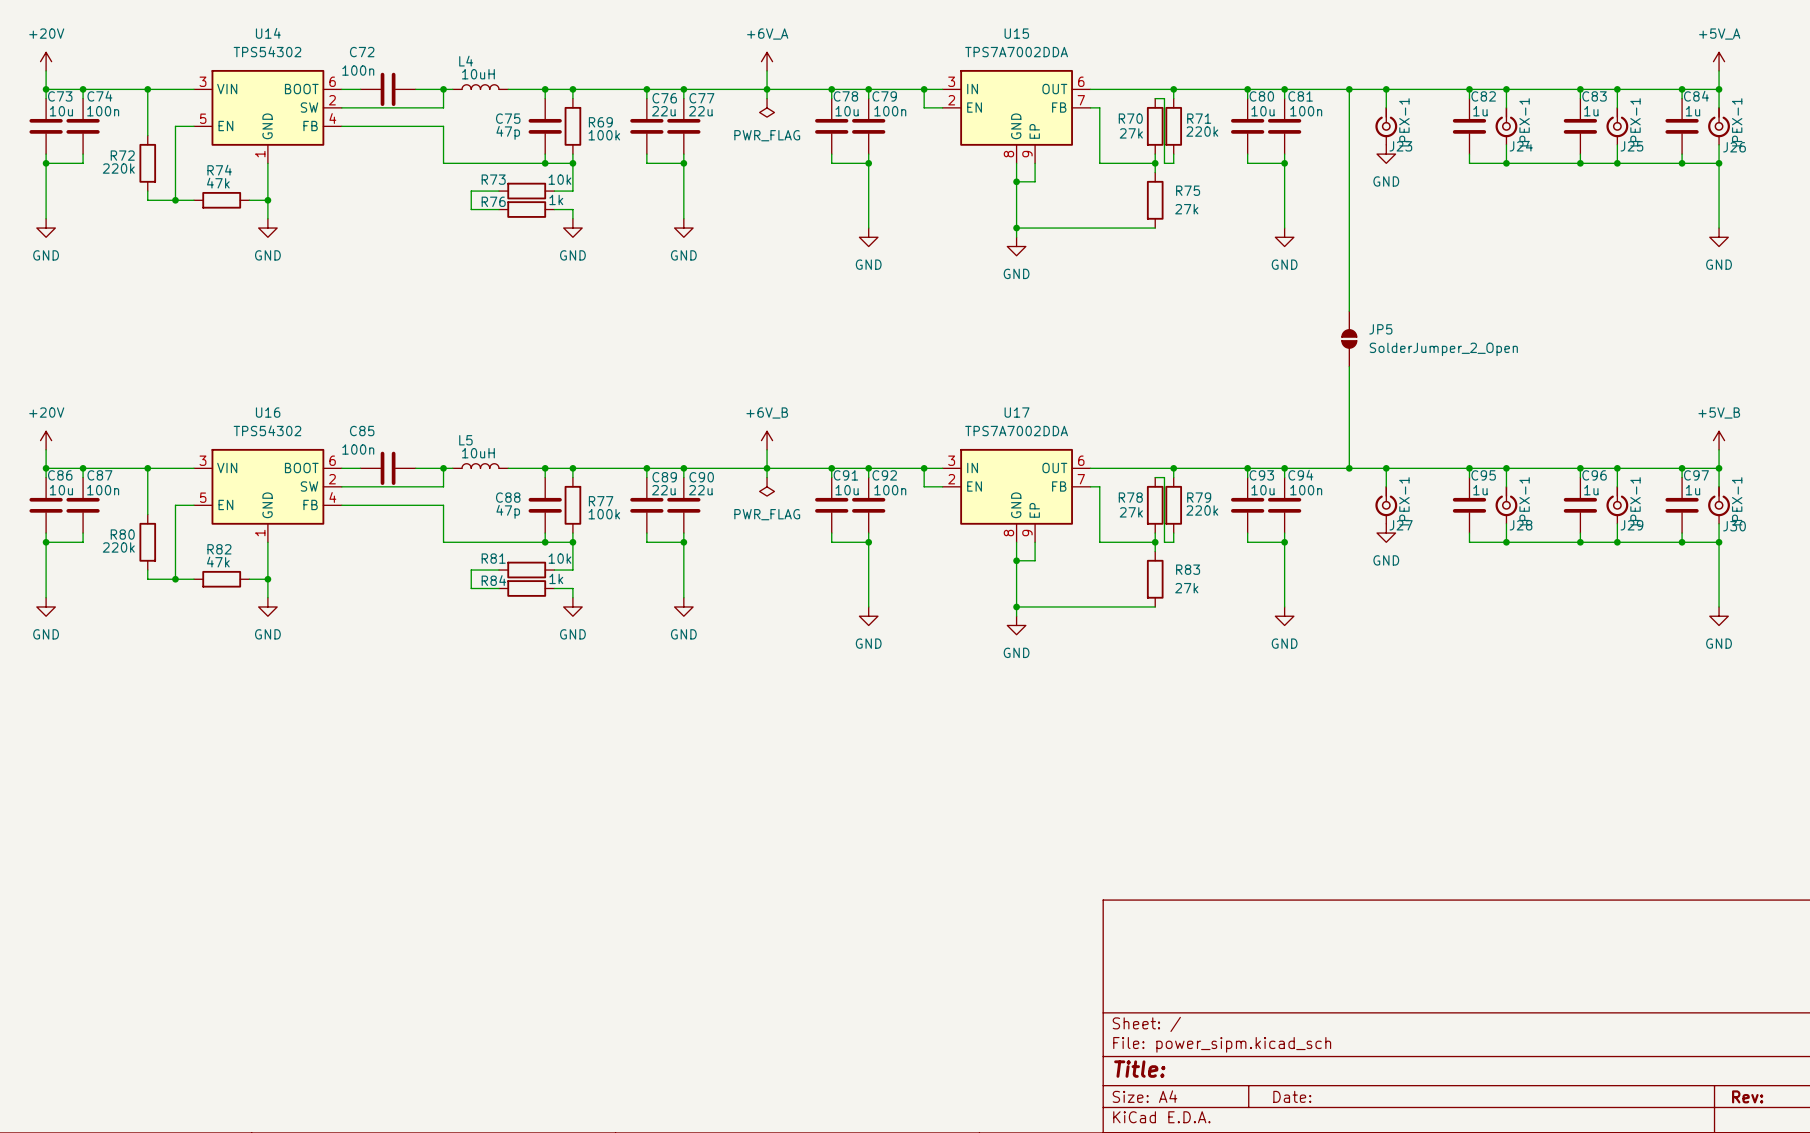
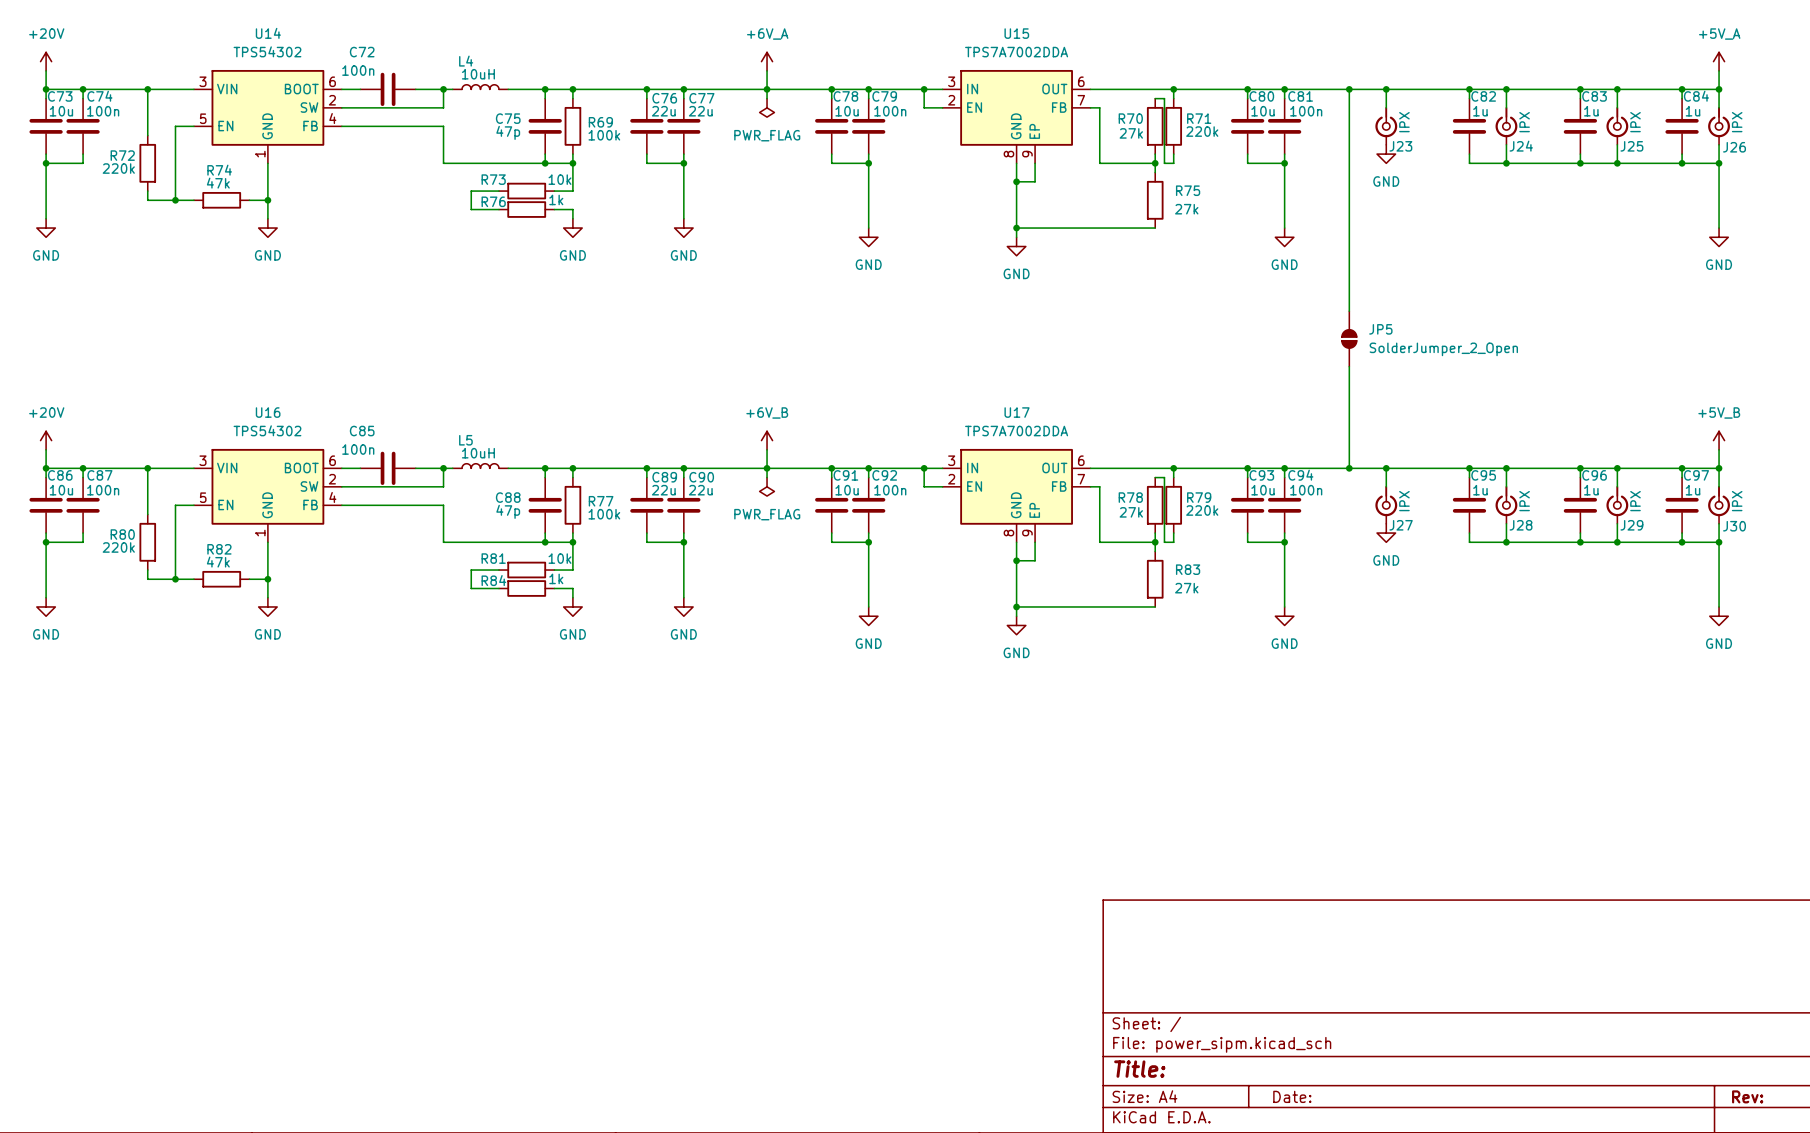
J23 value: IPEX-1 (1404, 122) -> IPX (1404, 122)
J24 value: IPEX-1 (1524, 122) -> IPX (1524, 122)
J25 value: IPEX-1 (1635, 122) -> IPX (1635, 122)
J26 value: IPEX-1 (1737, 122) -> IPX (1737, 122)
J27 value: IPEX-1 (1404, 501) -> IPX (1404, 501)
J28 value: IPEX-1 (1524, 501) -> IPX (1524, 501)
J29 value: IPEX-1 (1635, 501) -> IPX (1635, 501)
J30 value: IPEX-1 (1737, 501) -> IPX (1737, 501)

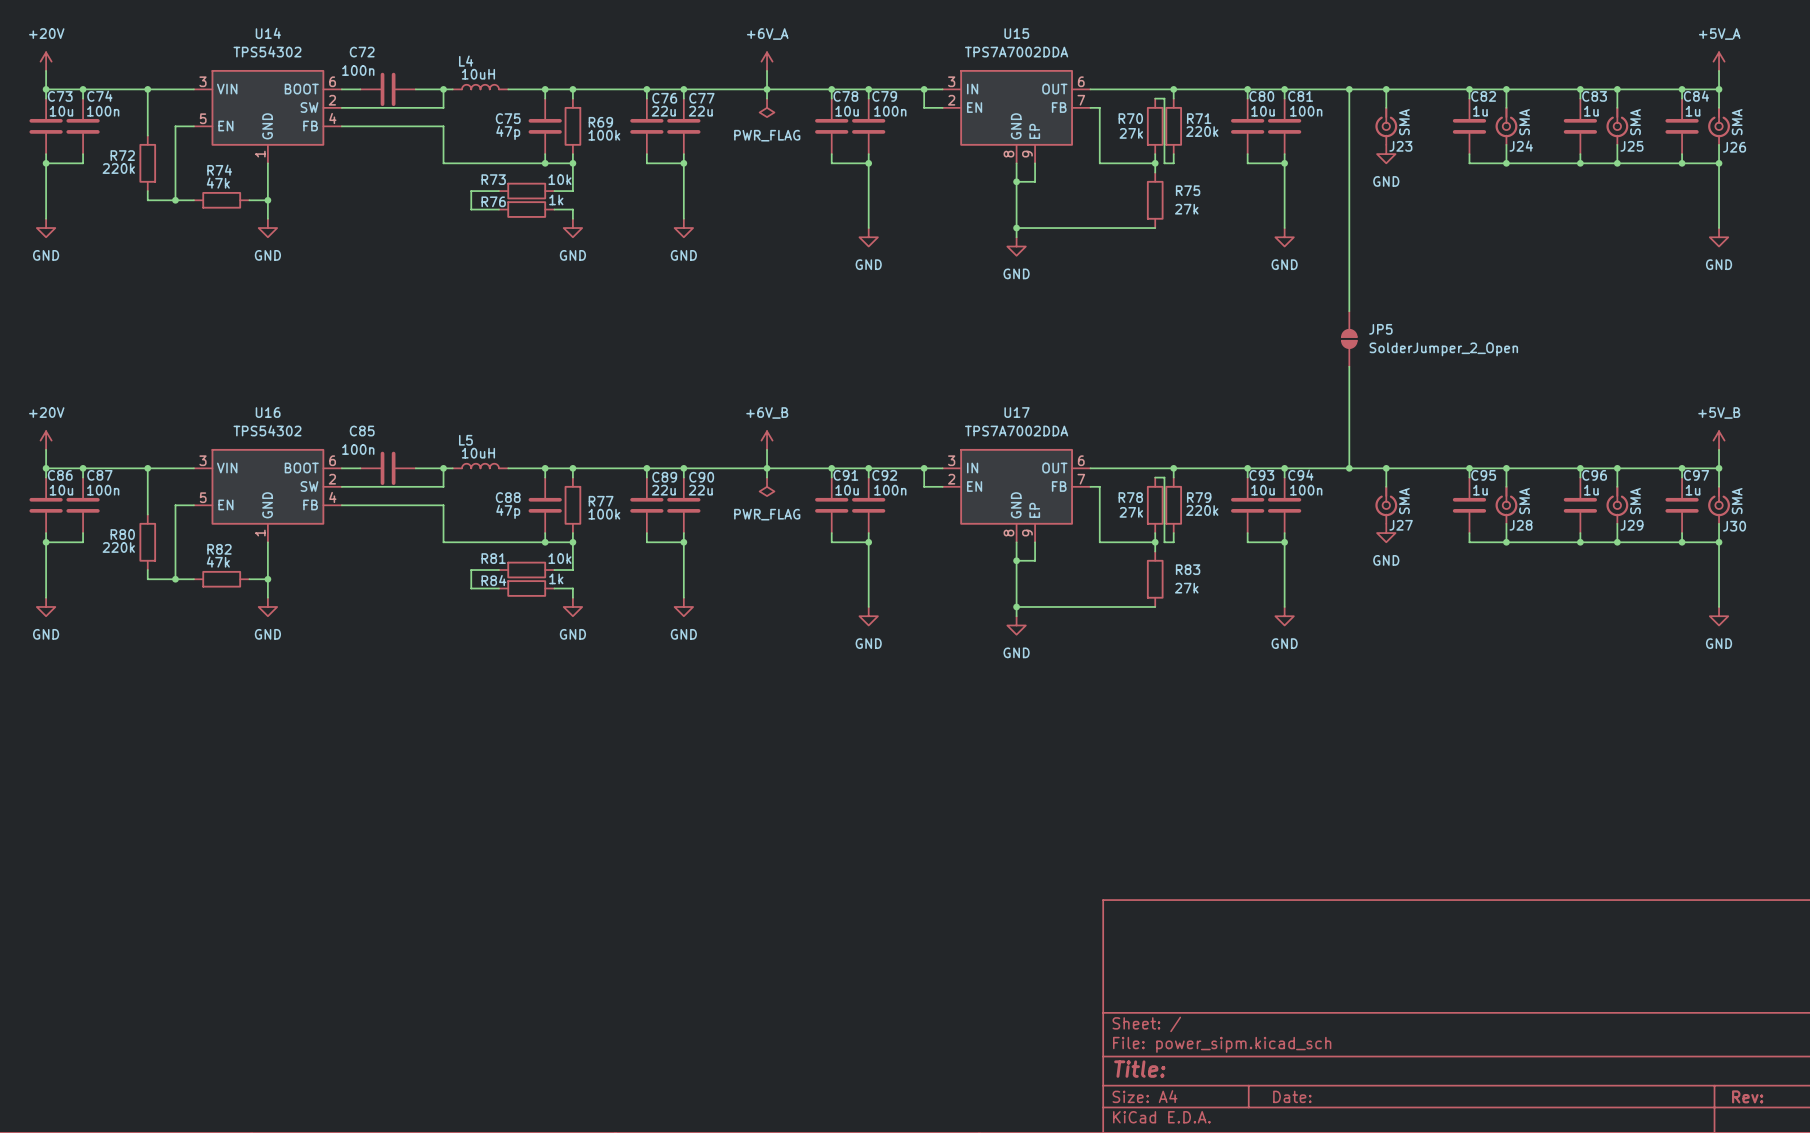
J23 value: IPX (1404, 122) -> SMA (1404, 122)
J24 value: IPX (1524, 122) -> SMA (1524, 122)
J25 value: IPX (1635, 122) -> SMA (1635, 122)
J26 value: IPX (1737, 122) -> SMA (1737, 122)
J27 value: IPX (1404, 501) -> SMA (1404, 501)
J28 value: IPX (1524, 501) -> SMA (1524, 501)
J29 value: IPX (1635, 501) -> SMA (1635, 501)
J30 value: IPX (1737, 501) -> SMA (1737, 501)

